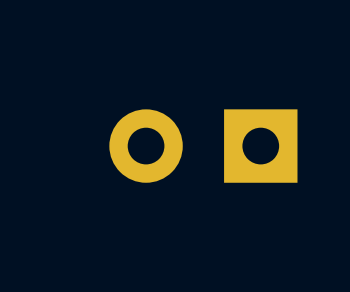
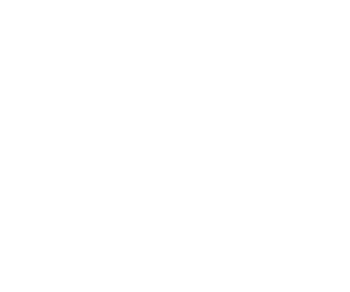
part: (203, 146) -> none

